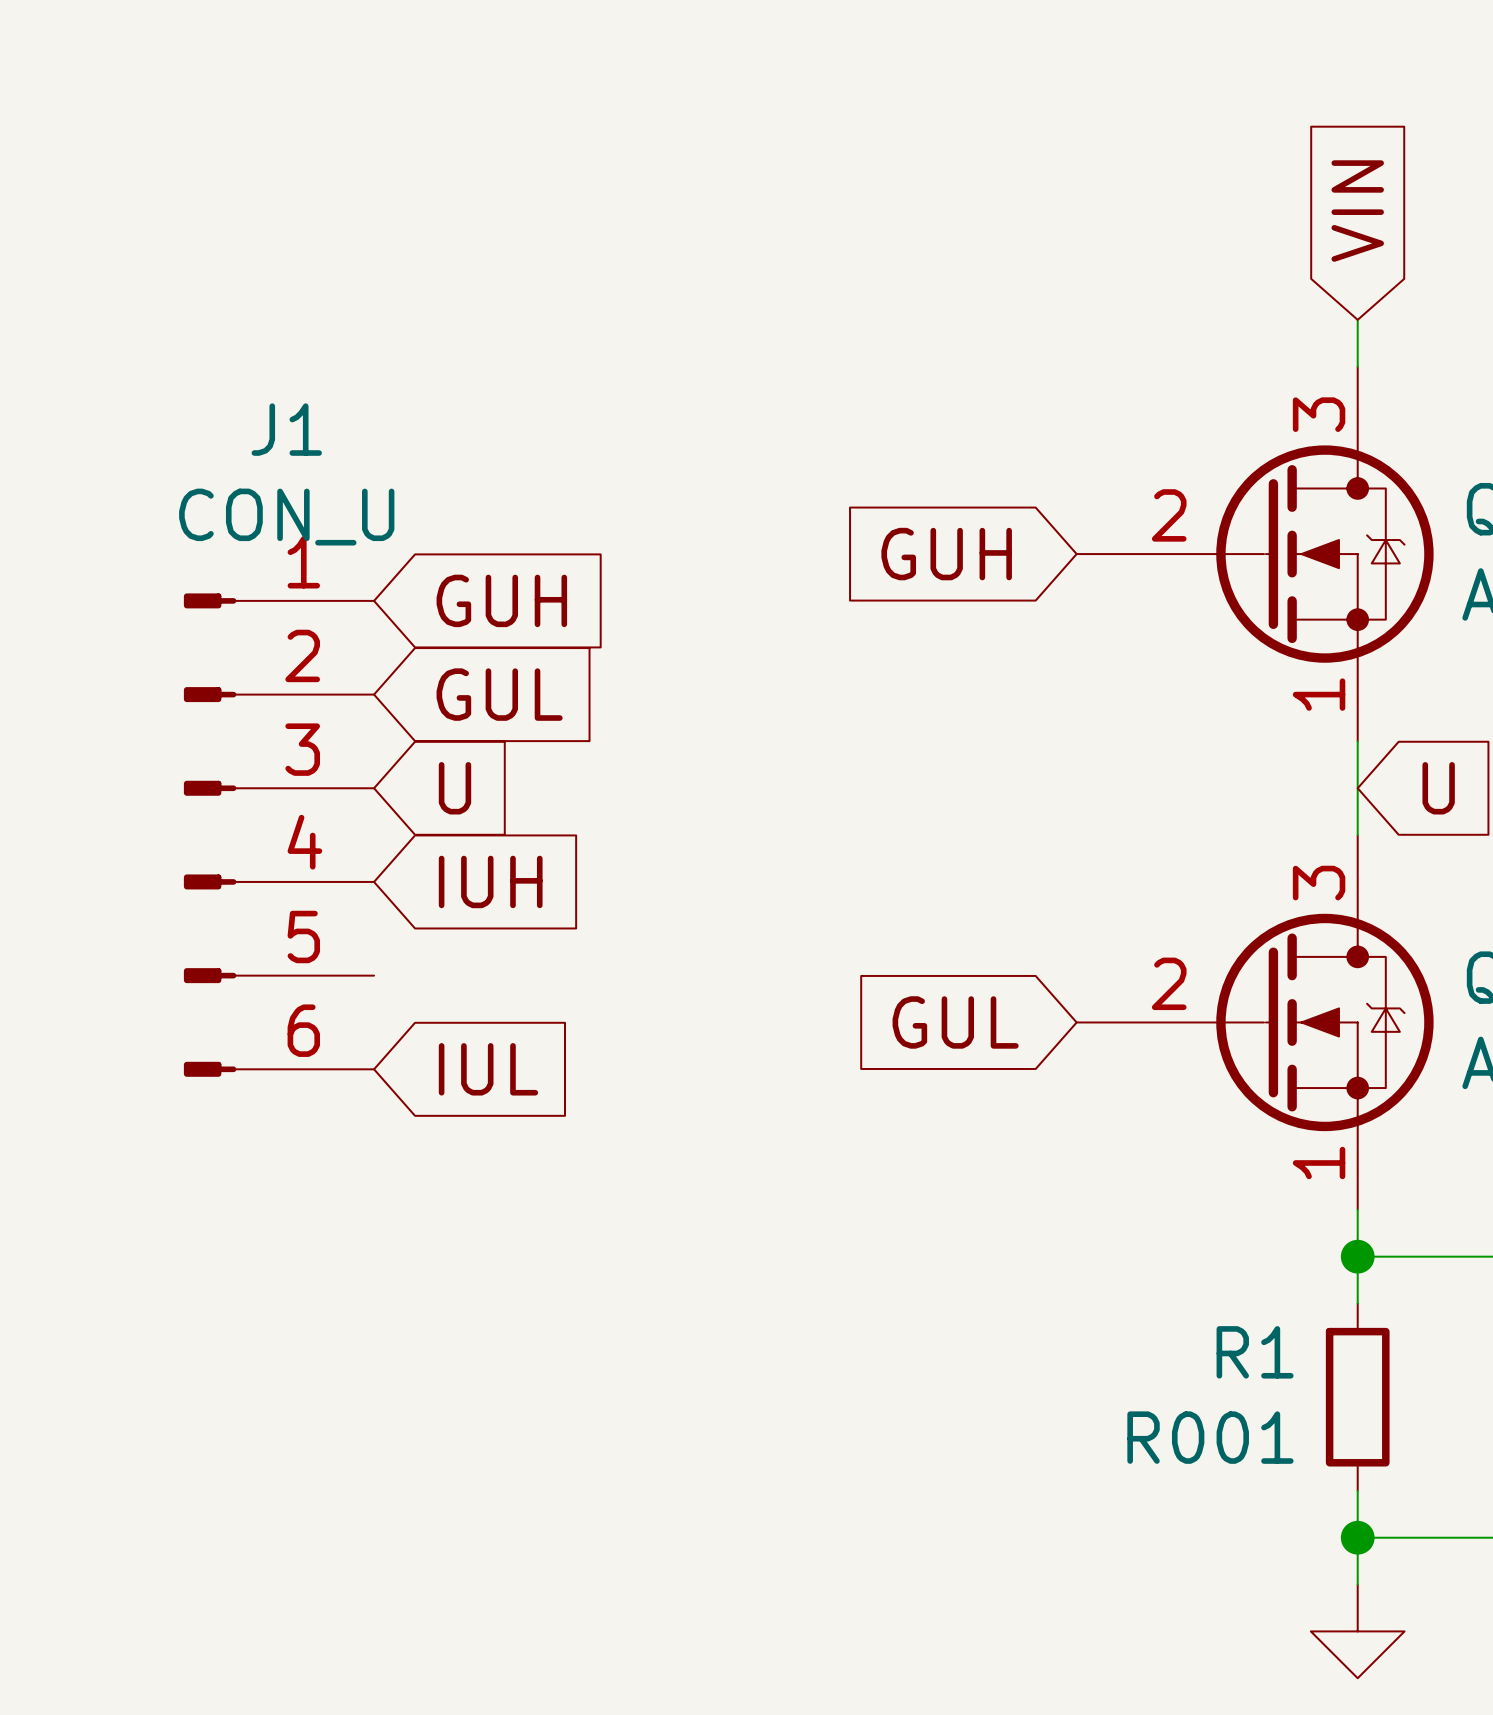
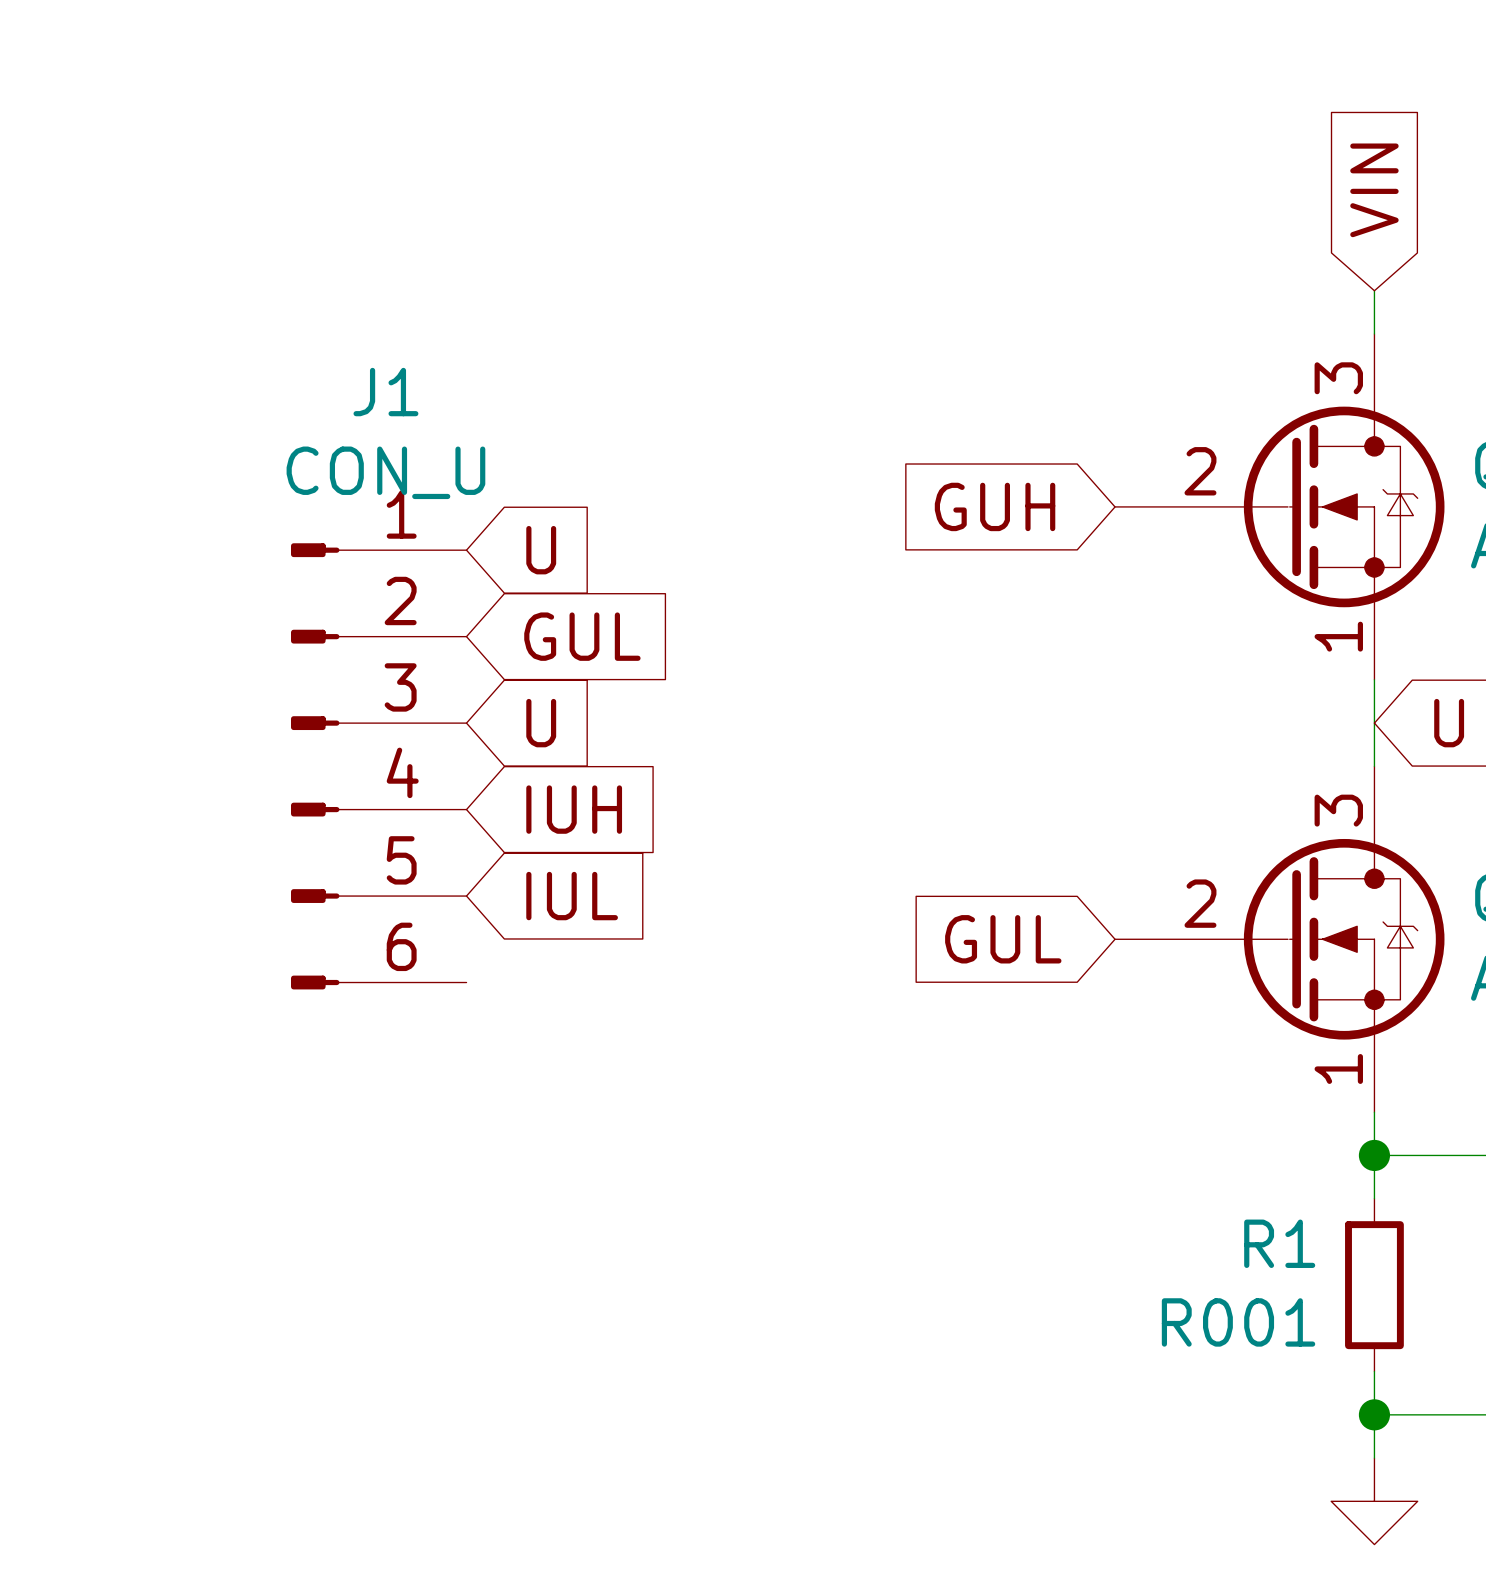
global label: GUH (501, 600) -> U (541, 550)
global label position: IUL (488, 1069) -> IUL (572, 896)

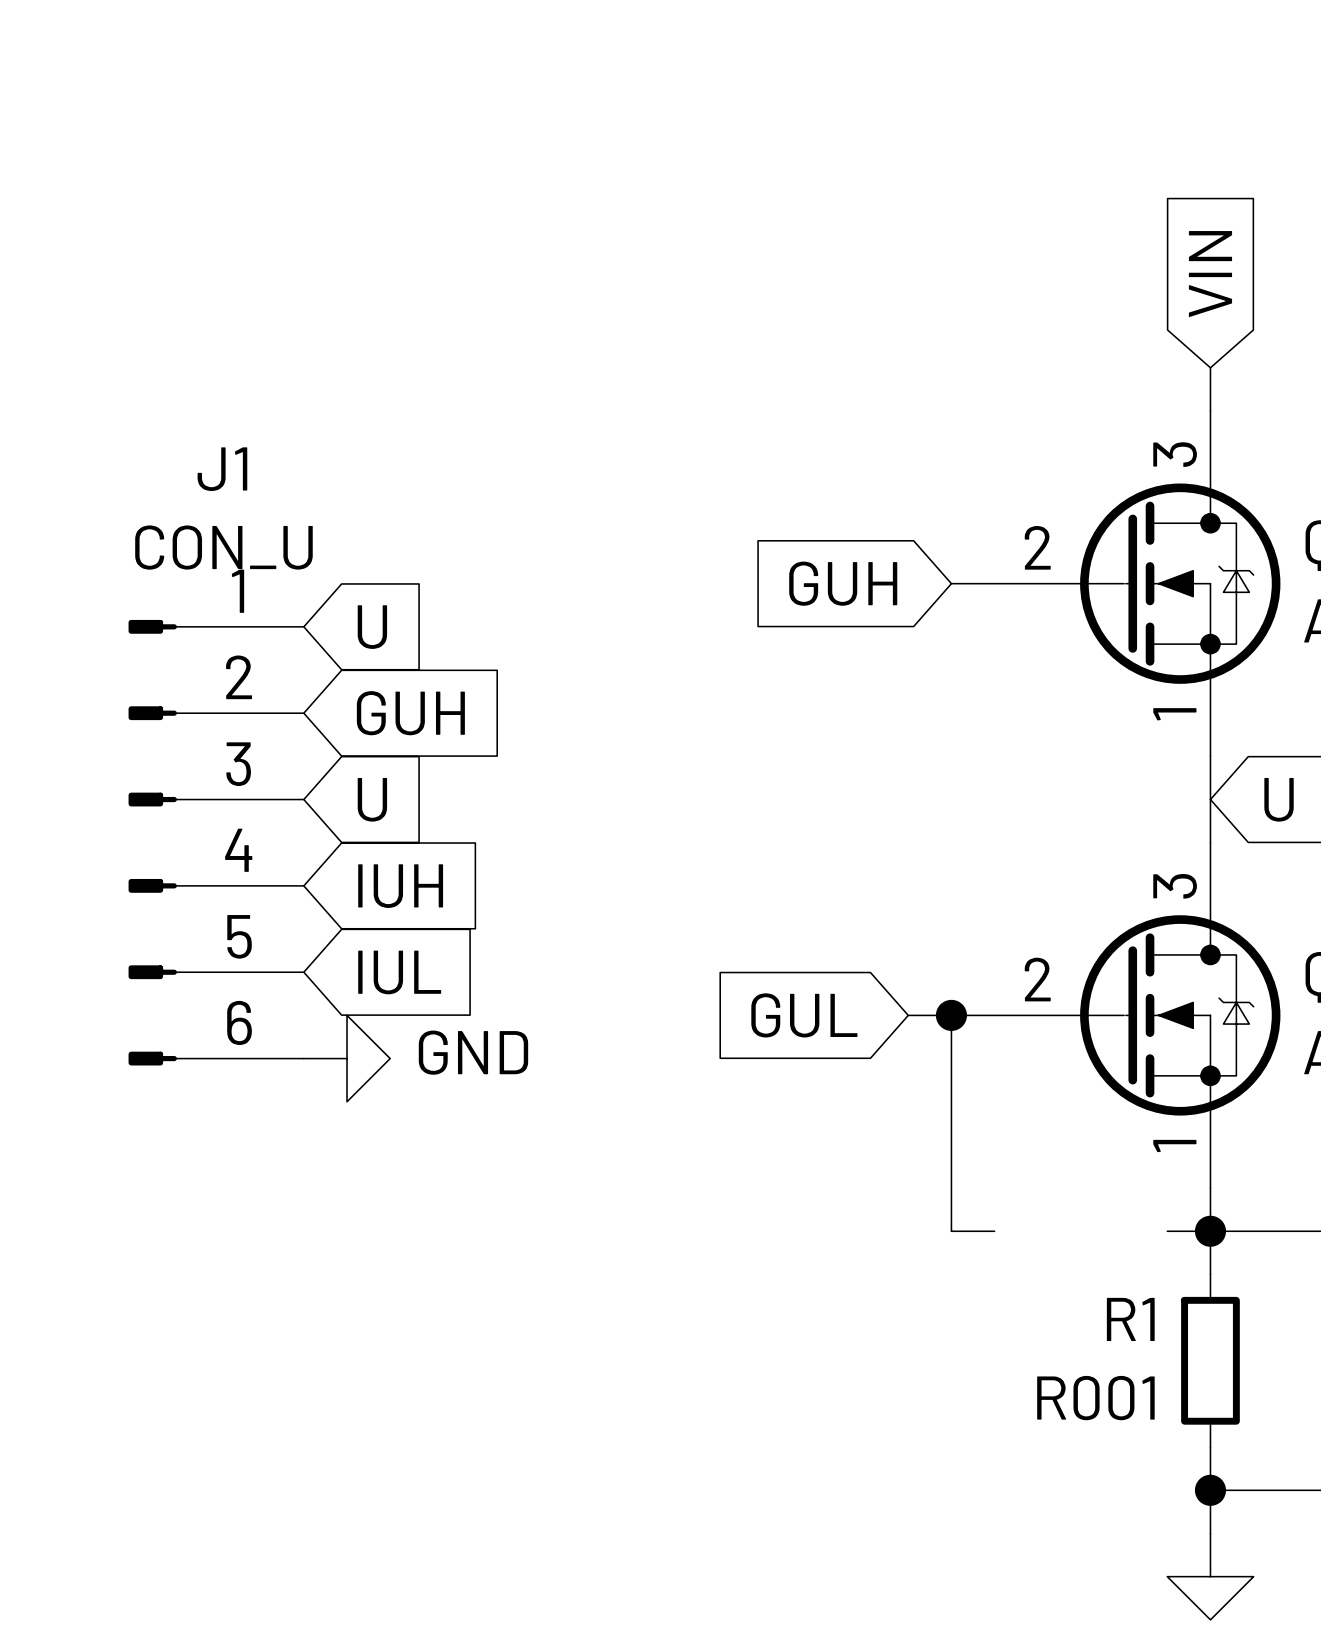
global label: GUL (582, 636) -> GUH (410, 713)
global label position: GUL (1003, 939) -> GUL (804, 1015)
wire: none -> (908, 1015) (951, 1015) (951, 1231) (994, 1231)
junction: none -> (951, 1015)
power symbol: none -> GND (347, 1058)
wire: none -> (1167, 1231) (1210, 1231)

